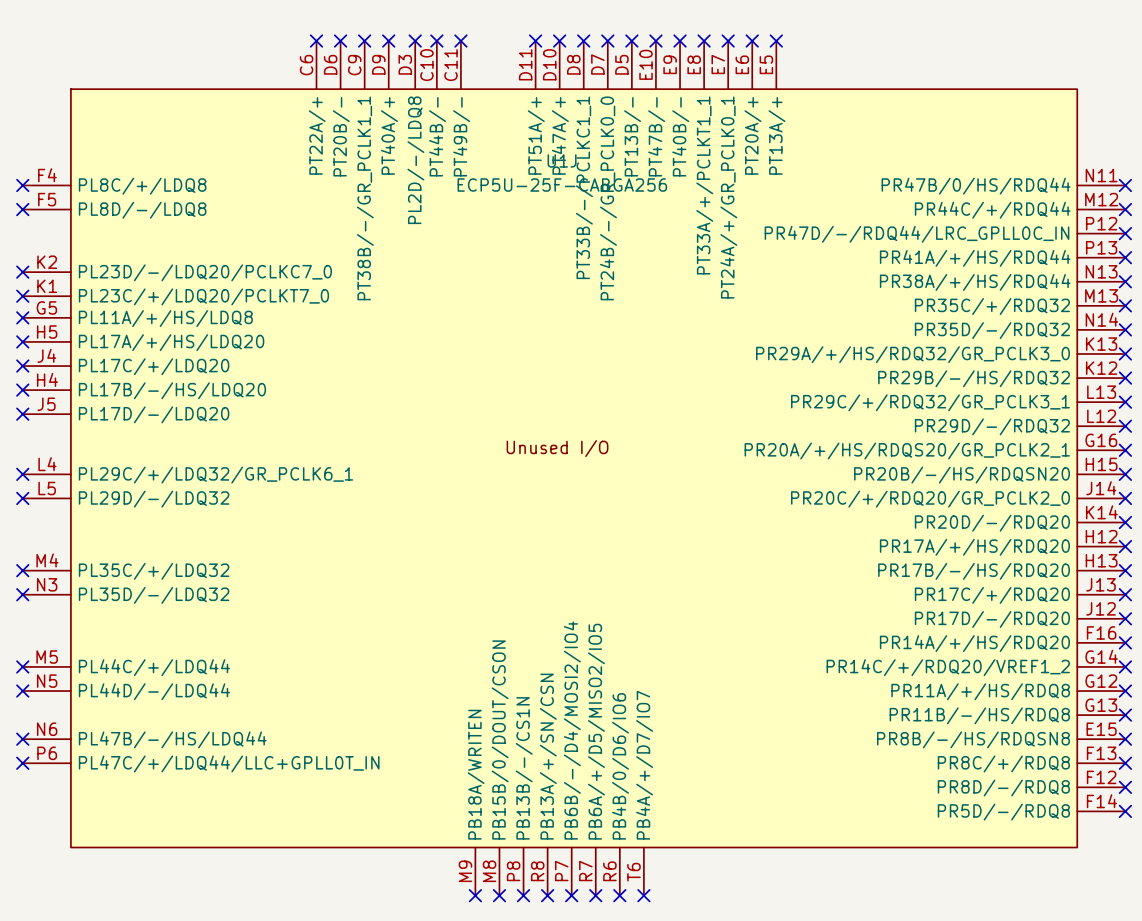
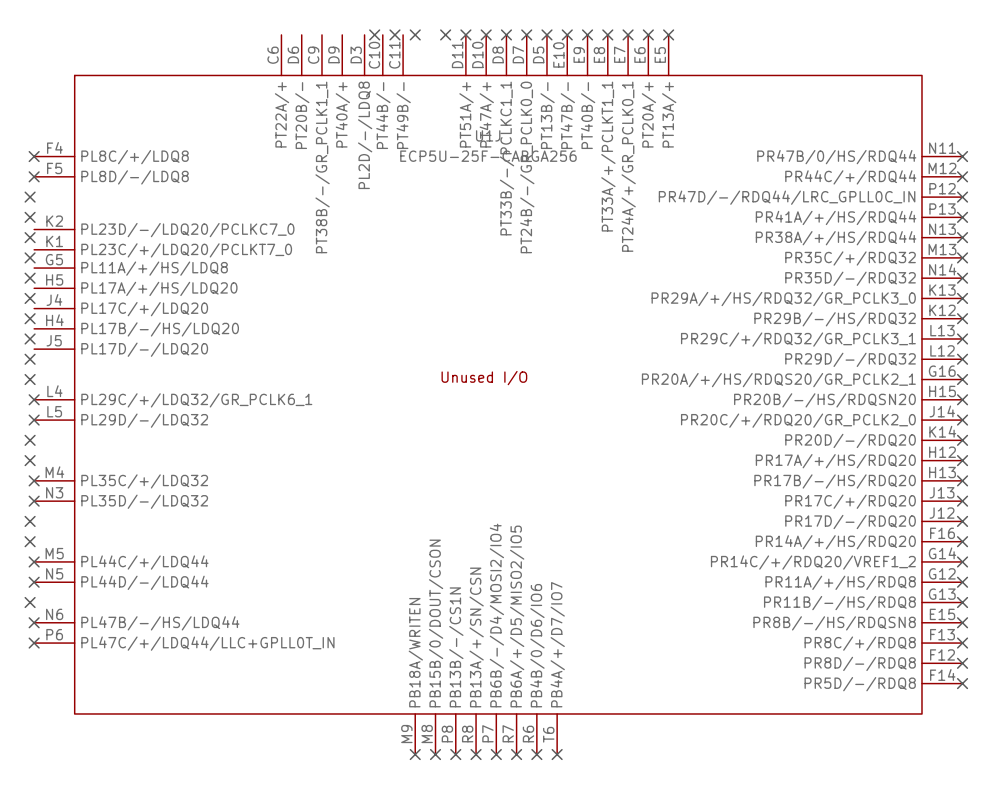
no-connect mark: (316, 41) -> none
no-connect mark: (340, 41) -> none
no-connect mark: (364, 41) -> none
no-connect mark: (388, 41) -> none
no-connect mark: (415, 41) -> none
no-connect mark: none -> (374, 34)
no-connect mark: (436, 41) -> none
no-connect mark: none -> (394, 34)
no-connect mark: (460, 41) -> none
no-connect mark: none -> (415, 34)
no-connect mark: none -> (445, 34)
no-connect mark: none -> (30, 197)
no-connect mark: none -> (30, 217)
no-connect mark: (22, 272) -> none
no-connect mark: none -> (30, 237)
no-connect mark: (22, 296) -> none
no-connect mark: none -> (30, 257)
no-connect mark: (22, 317) -> none
no-connect mark: none -> (30, 278)
no-connect mark: (22, 341) -> none
no-connect mark: none -> (30, 298)
no-connect mark: (22, 366) -> none
no-connect mark: none -> (30, 318)
no-connect mark: (22, 390) -> none
no-connect mark: none -> (30, 338)
no-connect mark: (22, 414) -> none
no-connect mark: none -> (30, 359)
no-connect mark: none -> (30, 379)
no-connect mark: none -> (30, 440)
no-connect mark: none -> (30, 460)
no-connect mark: none -> (30, 521)
no-connect mark: none -> (30, 541)
no-connect mark: none -> (30, 602)

